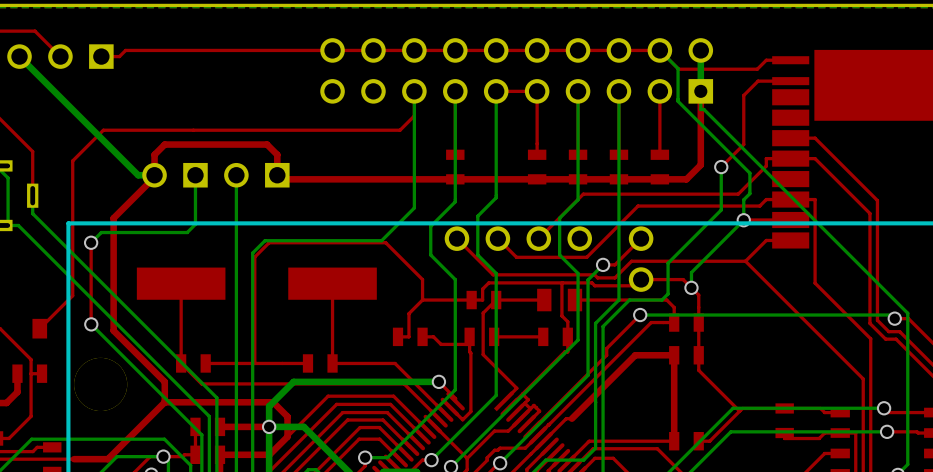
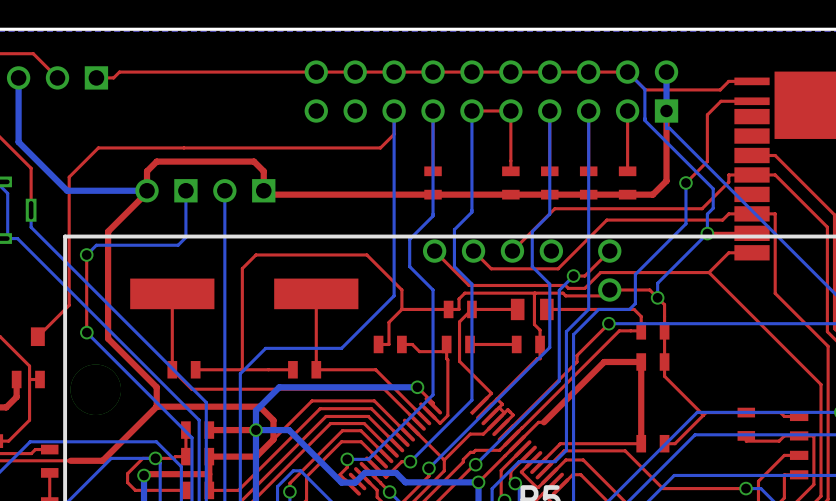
bottom track: (19, 56) (138, 175) (19, 56) -> (131, 190) (67, 190) (18, 142) (18, 77)
bottom track: (414, 207) (381, 240) (265, 240) (252, 253) (252, 367) -> (394, 221) (394, 295) (341, 348) (265, 348) (240, 373)

